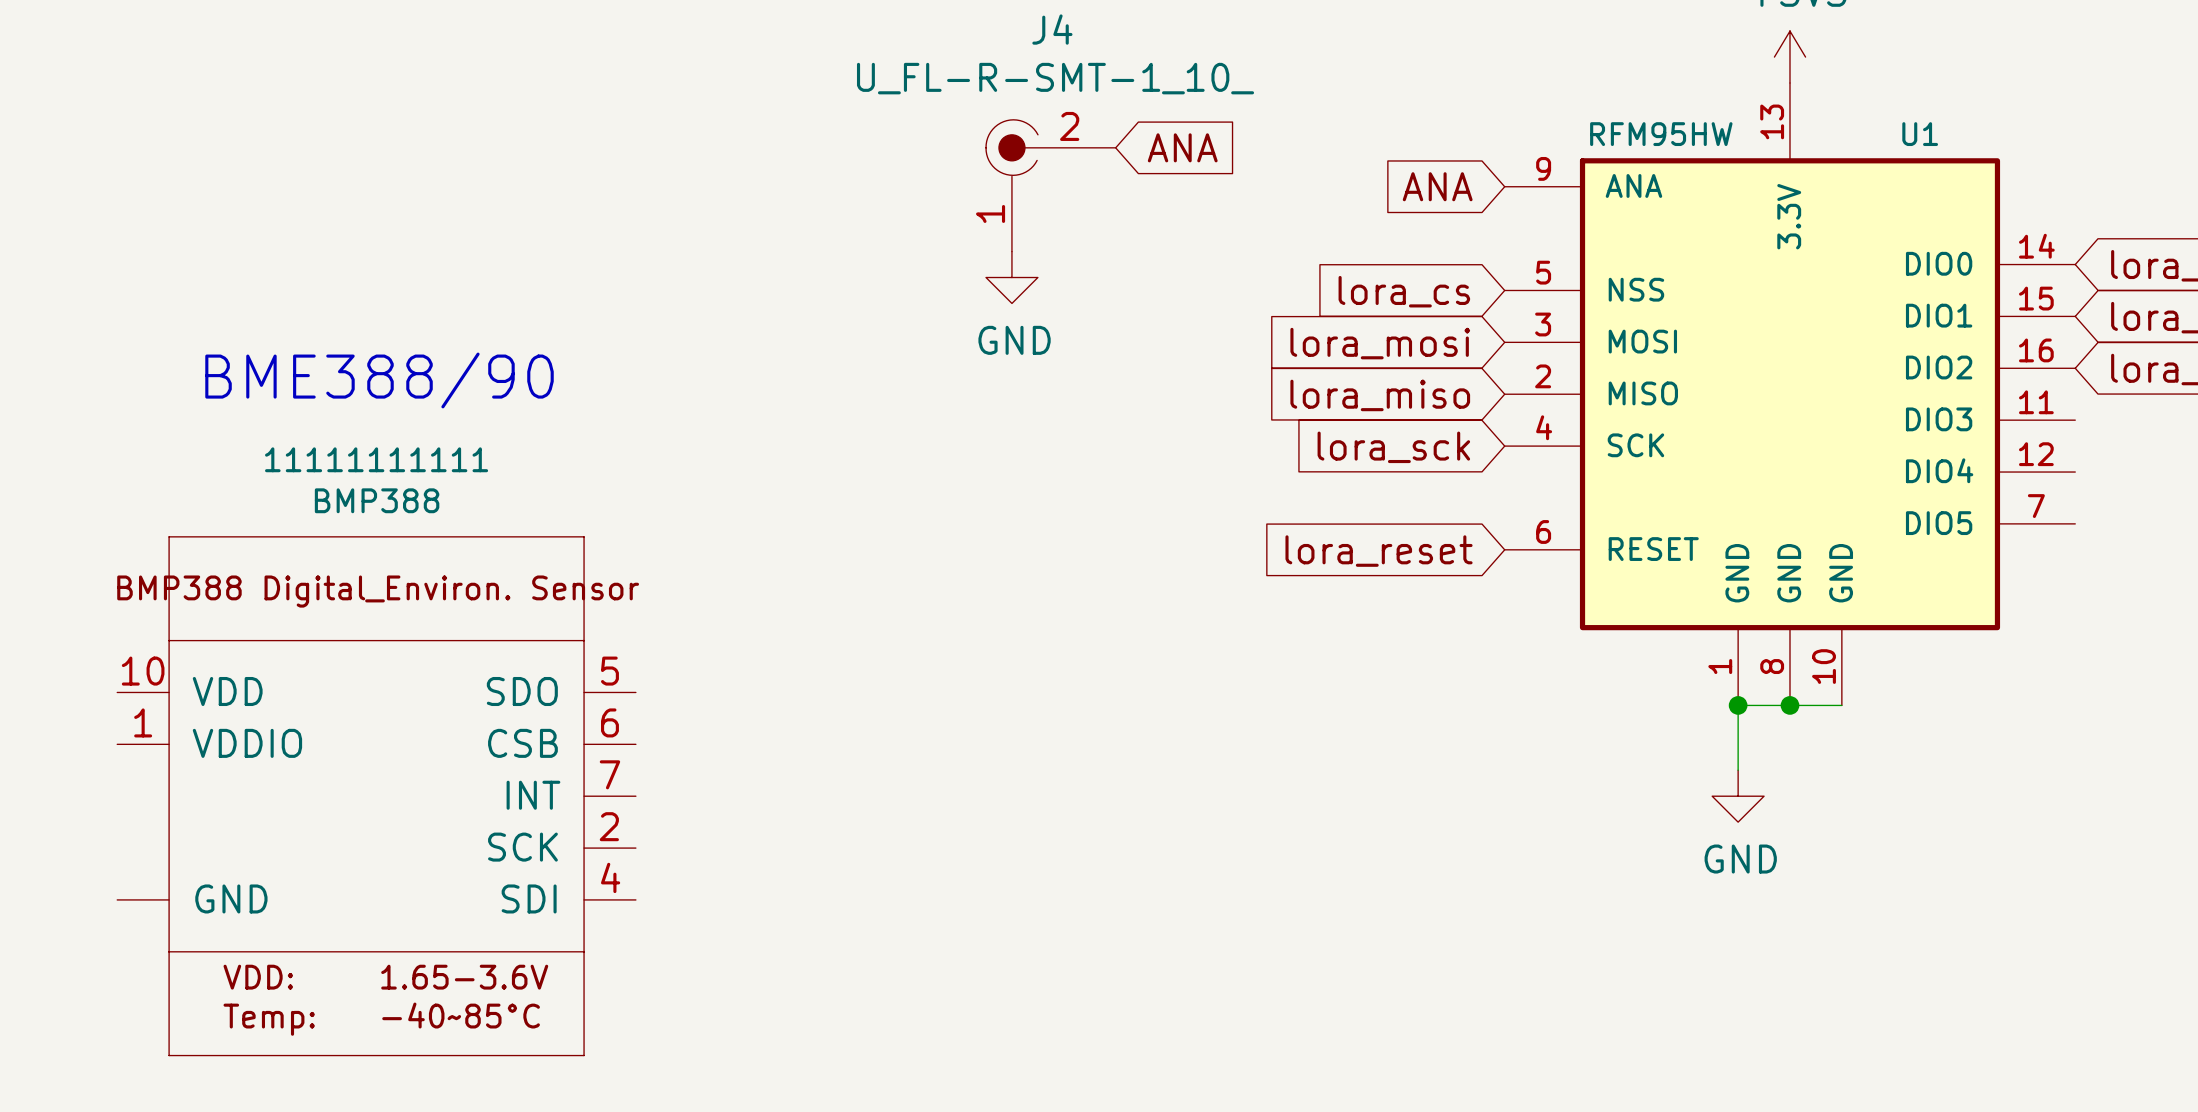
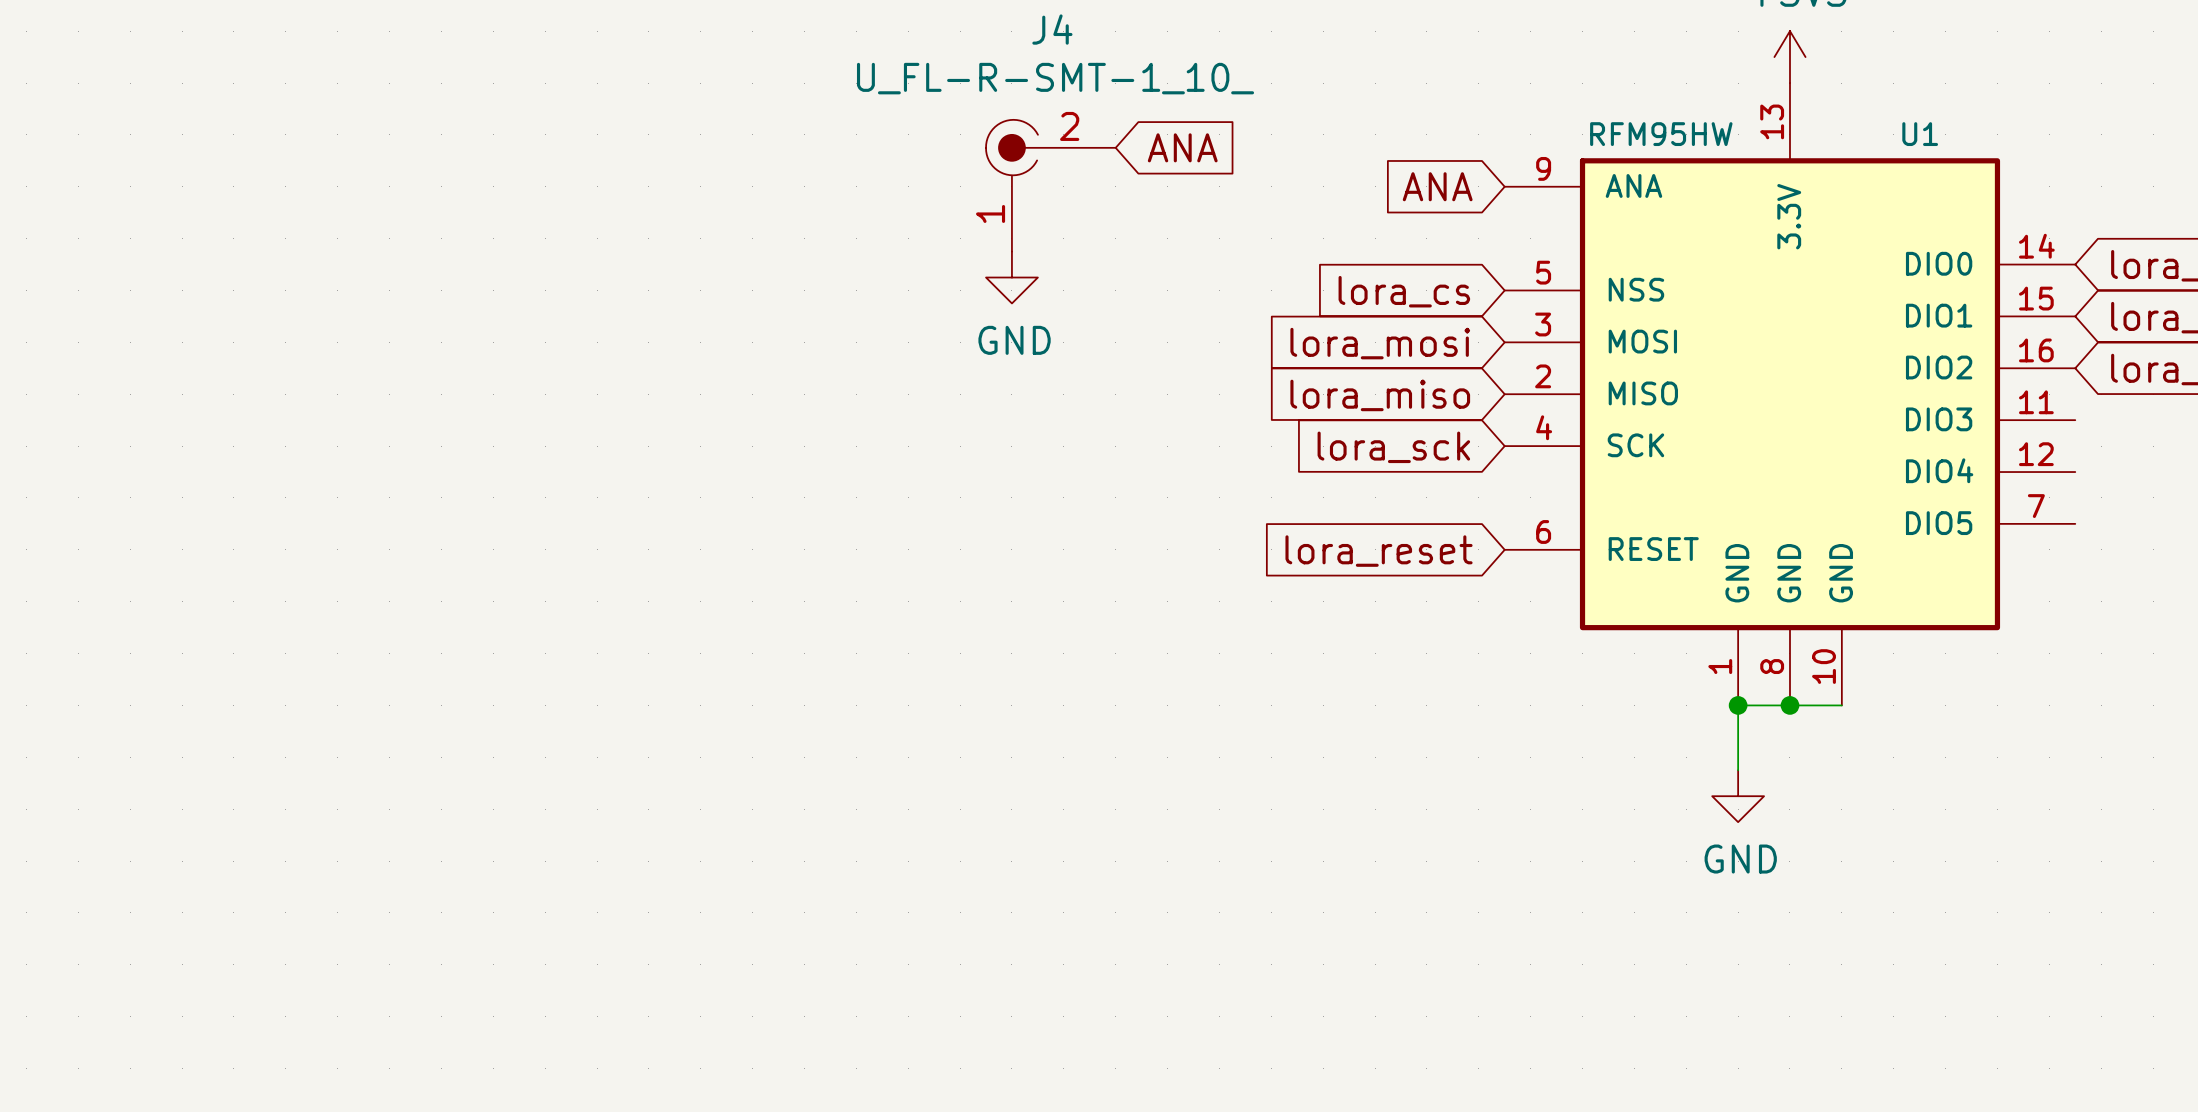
text: BME388/90 (379, 380) -> none
11111111111: BMP388 (376, 796) -> none

